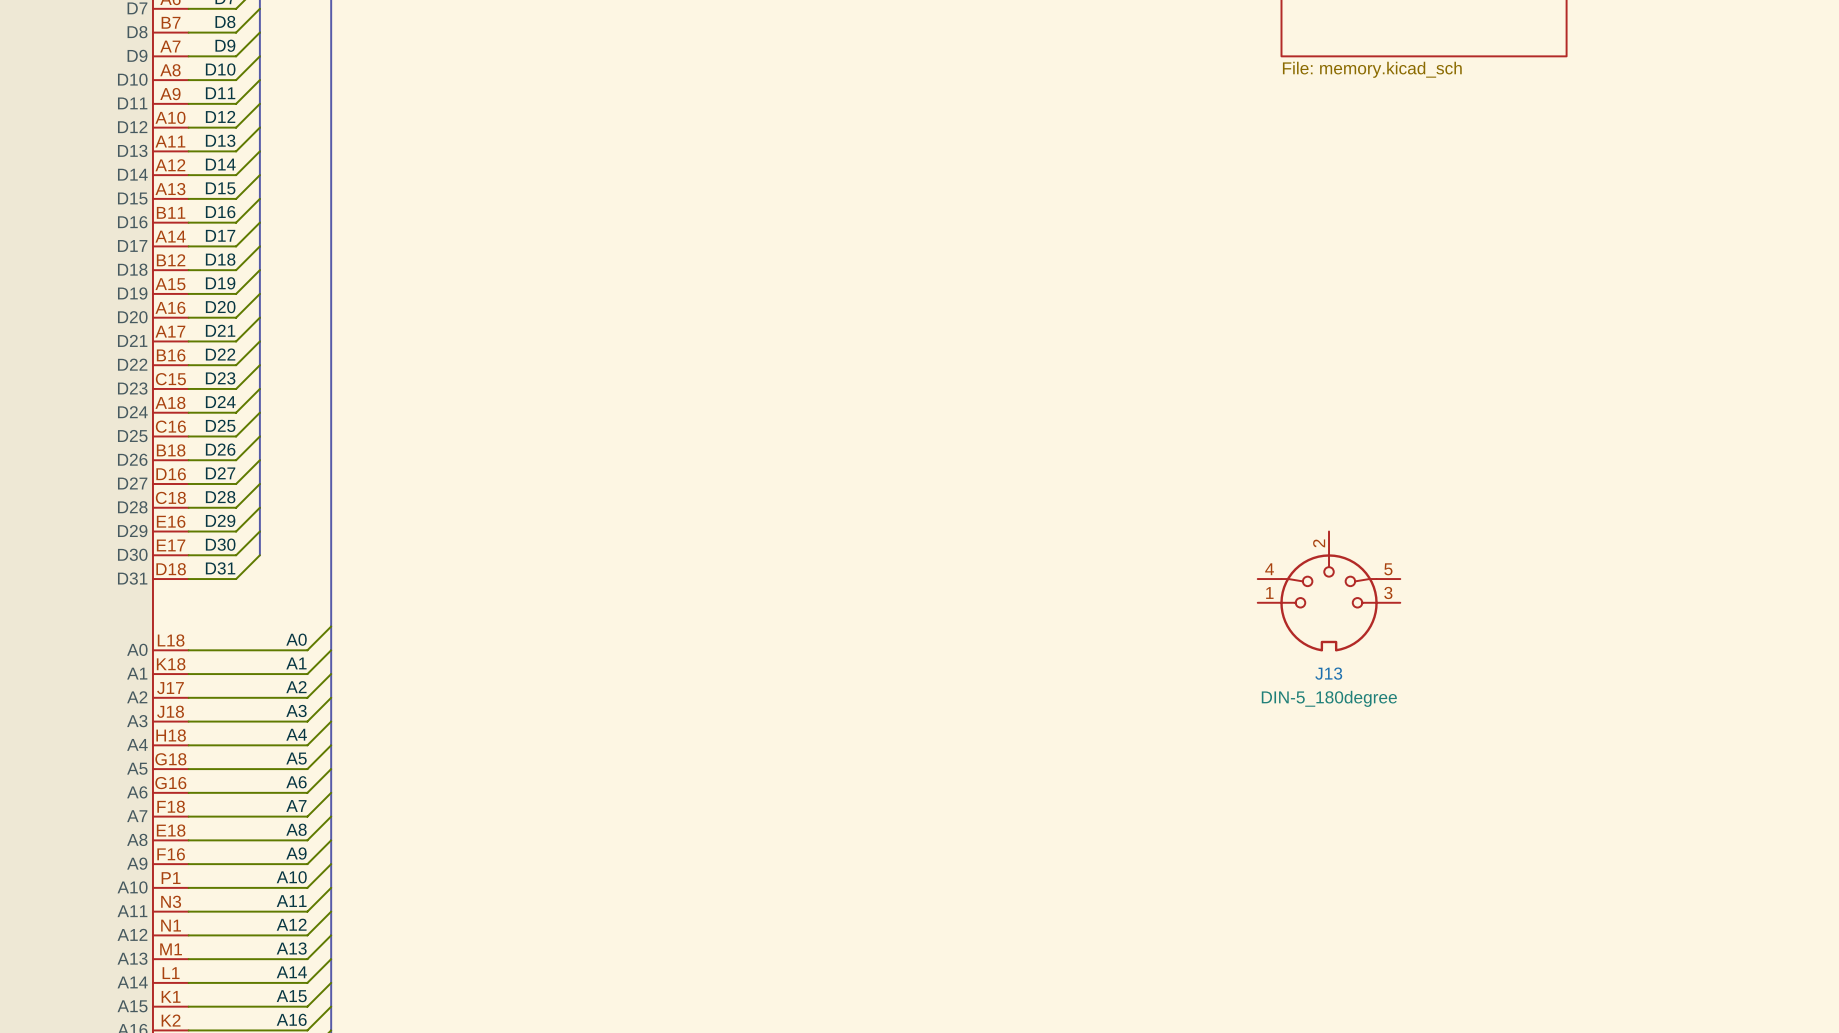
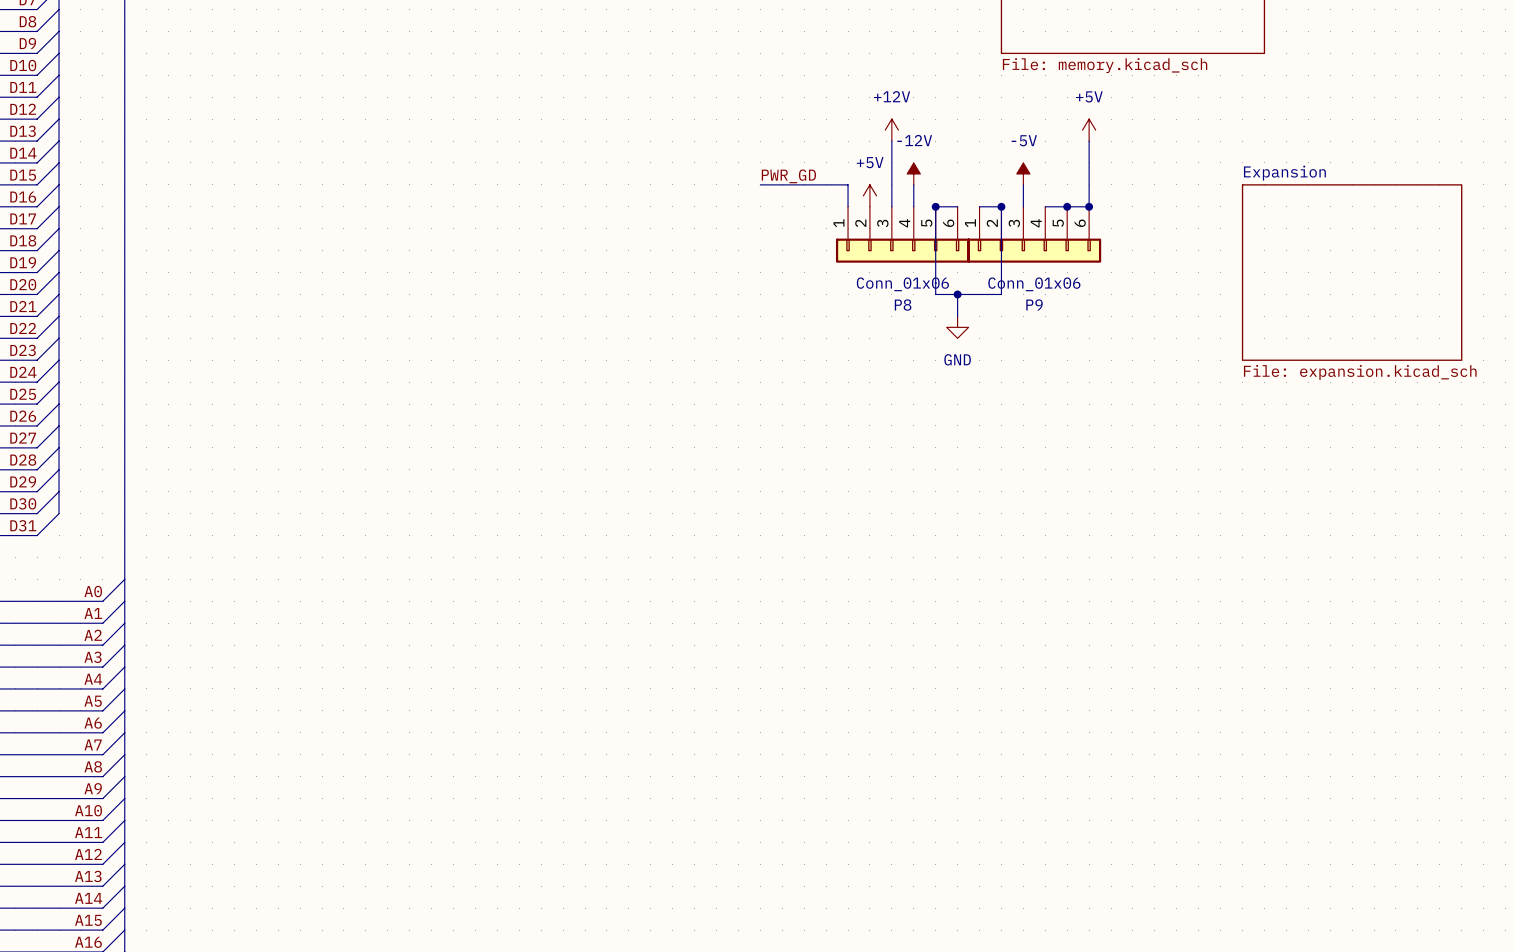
power symbol: none -> +12V (891, 130)
power symbol: none -> +5V (1089, 130)
wire: none -> (891, 141) (891, 206)
wire: none -> (1089, 141) (1089, 206) (1045, 206)
power symbol: none -> -12V (913, 173)
power symbol: none -> -5V (1023, 173)
label: none -> PWR_GD (788, 176)
wire: none -> (760, 184) (848, 184) (848, 206)
wire: none -> (913, 184) (913, 206)
wire: none -> (1023, 184) (1023, 206)
power symbol: none -> +5V (869, 195)
junction: none -> (935, 206)
wire: none -> (957, 206) (935, 206) (935, 294) (1001, 294) (1001, 206) (979, 206)
junction: none -> (1001, 206)
junction: none -> (1067, 206)
junction: none -> (1089, 206)
P8: none -> Conn_01x06 (902, 234)
P9: none -> Conn_01x06 (1034, 234)
sheet Expansion: none -> File: expansion.kicad_sch (1352, 272)
wire: none -> (957, 294) (957, 316)
junction: none -> (957, 294)
power symbol: none -> GND (957, 327)
J13: DIN-5_180degree (1329, 591) -> none

